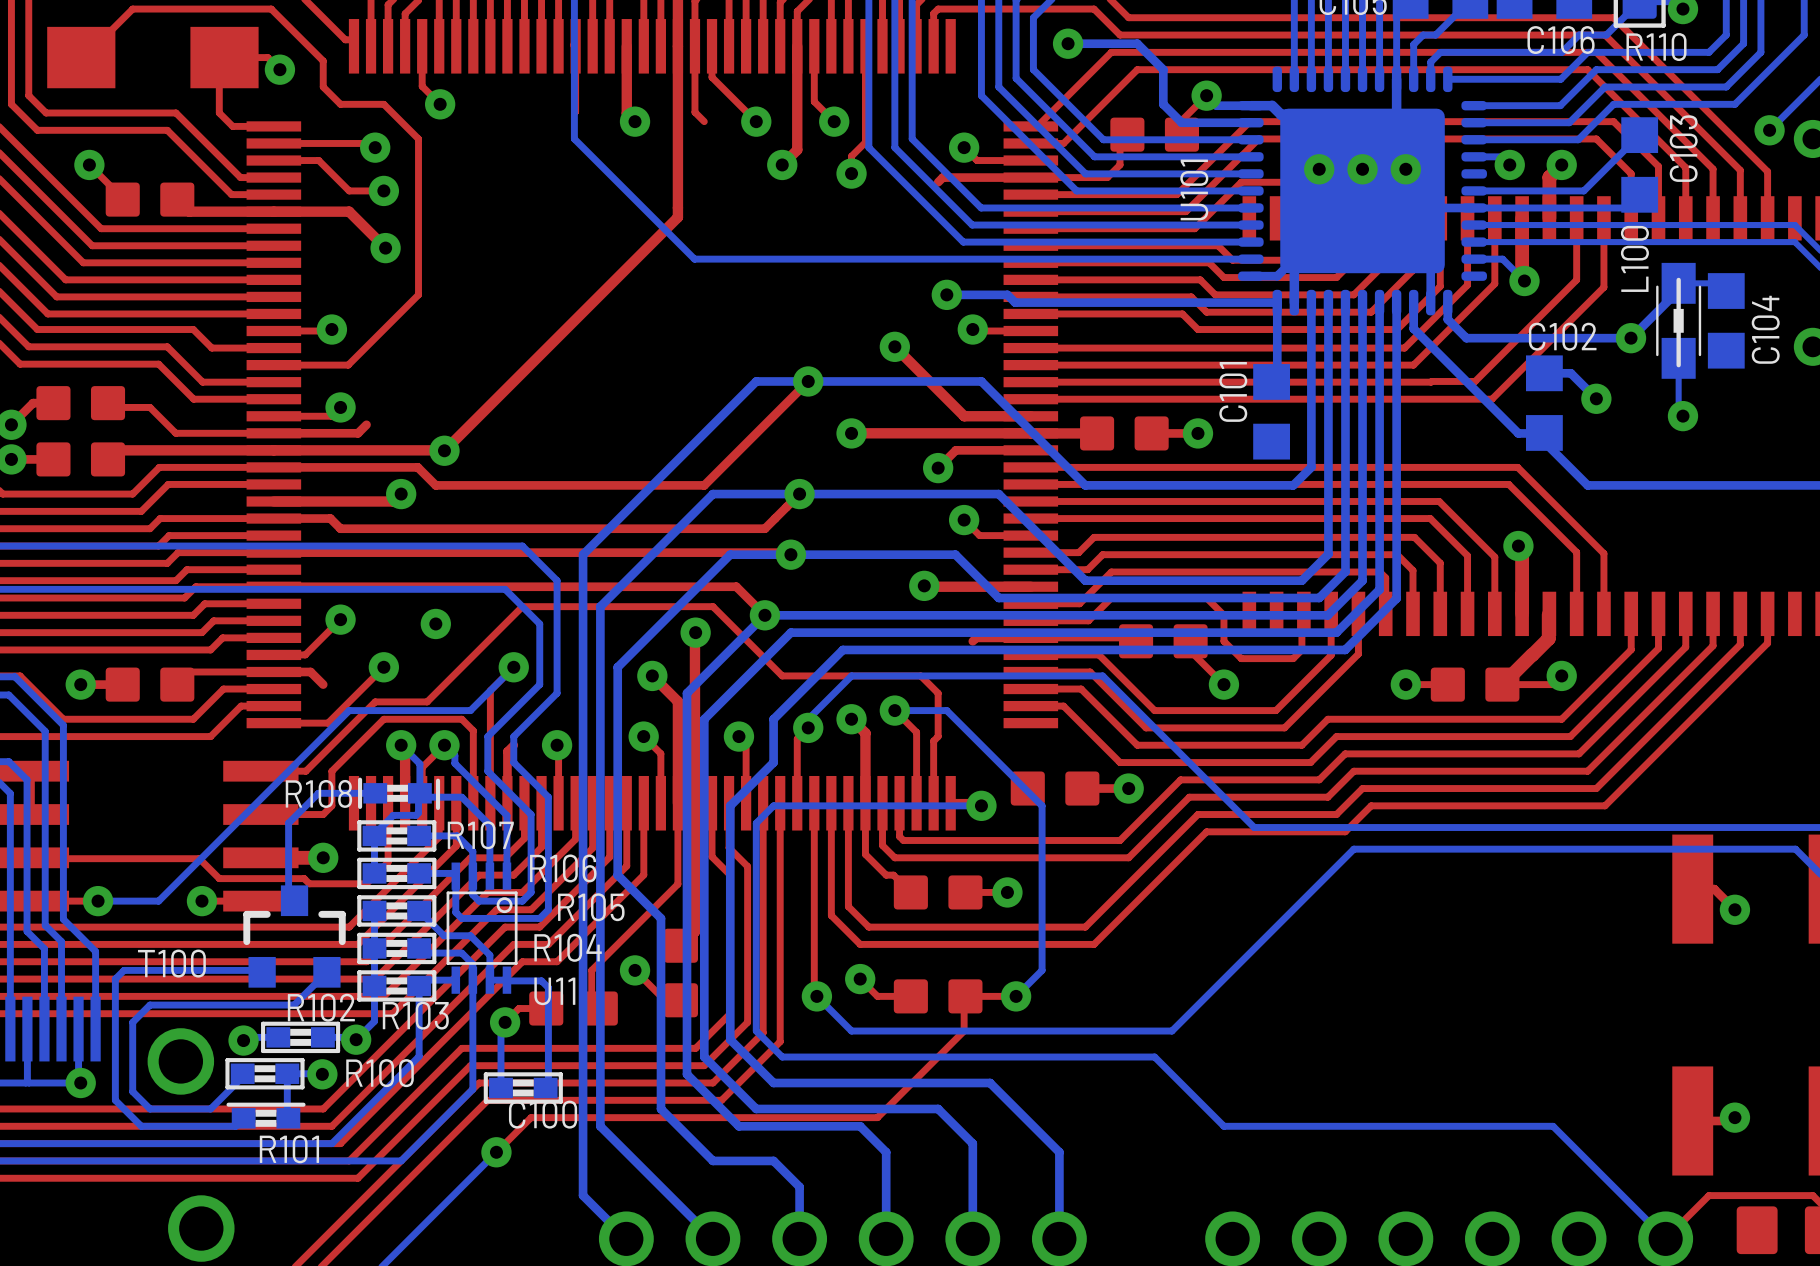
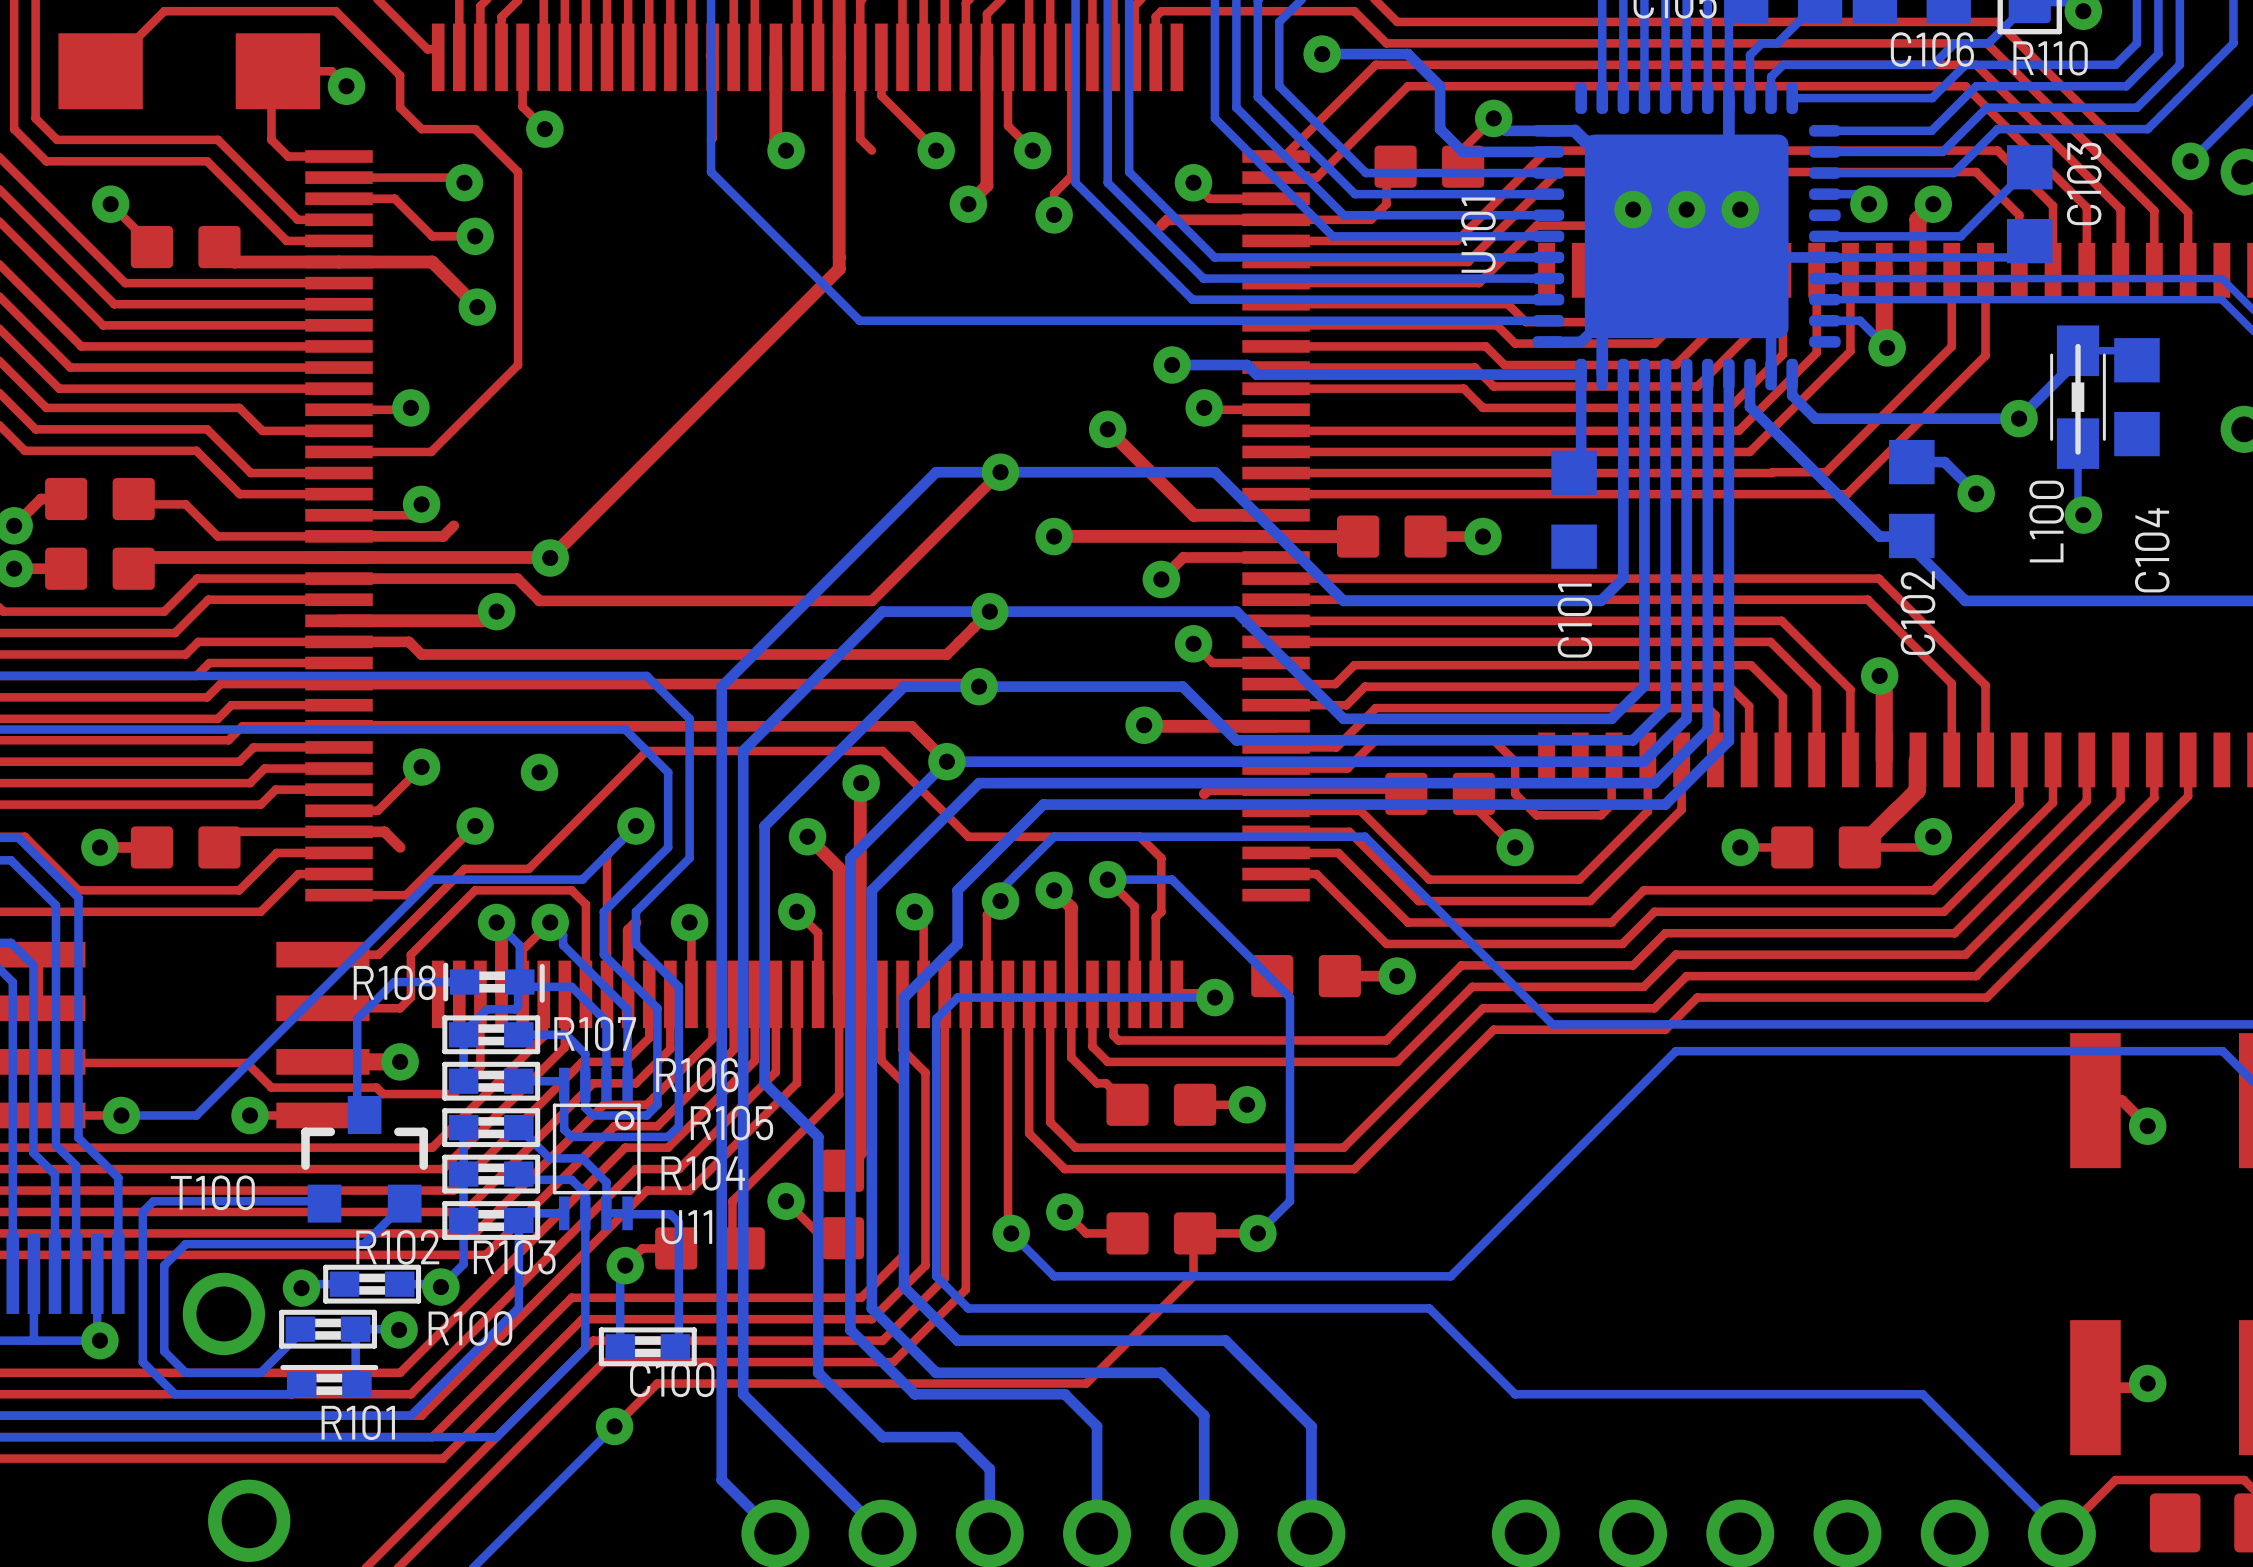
L100 name position: L100 (1634, 258) -> L100 (2046, 521)
C104 name position: C104 (1765, 329) -> C104 (2152, 550)
C102 name rotation: 0° (1562, 336) -> 90° counterclockwise (1918, 613)
C102 name position: C102 (1562, 336) -> C102 (1918, 613)
C101 name position: C101 (1233, 391) -> C101 (1574, 620)

